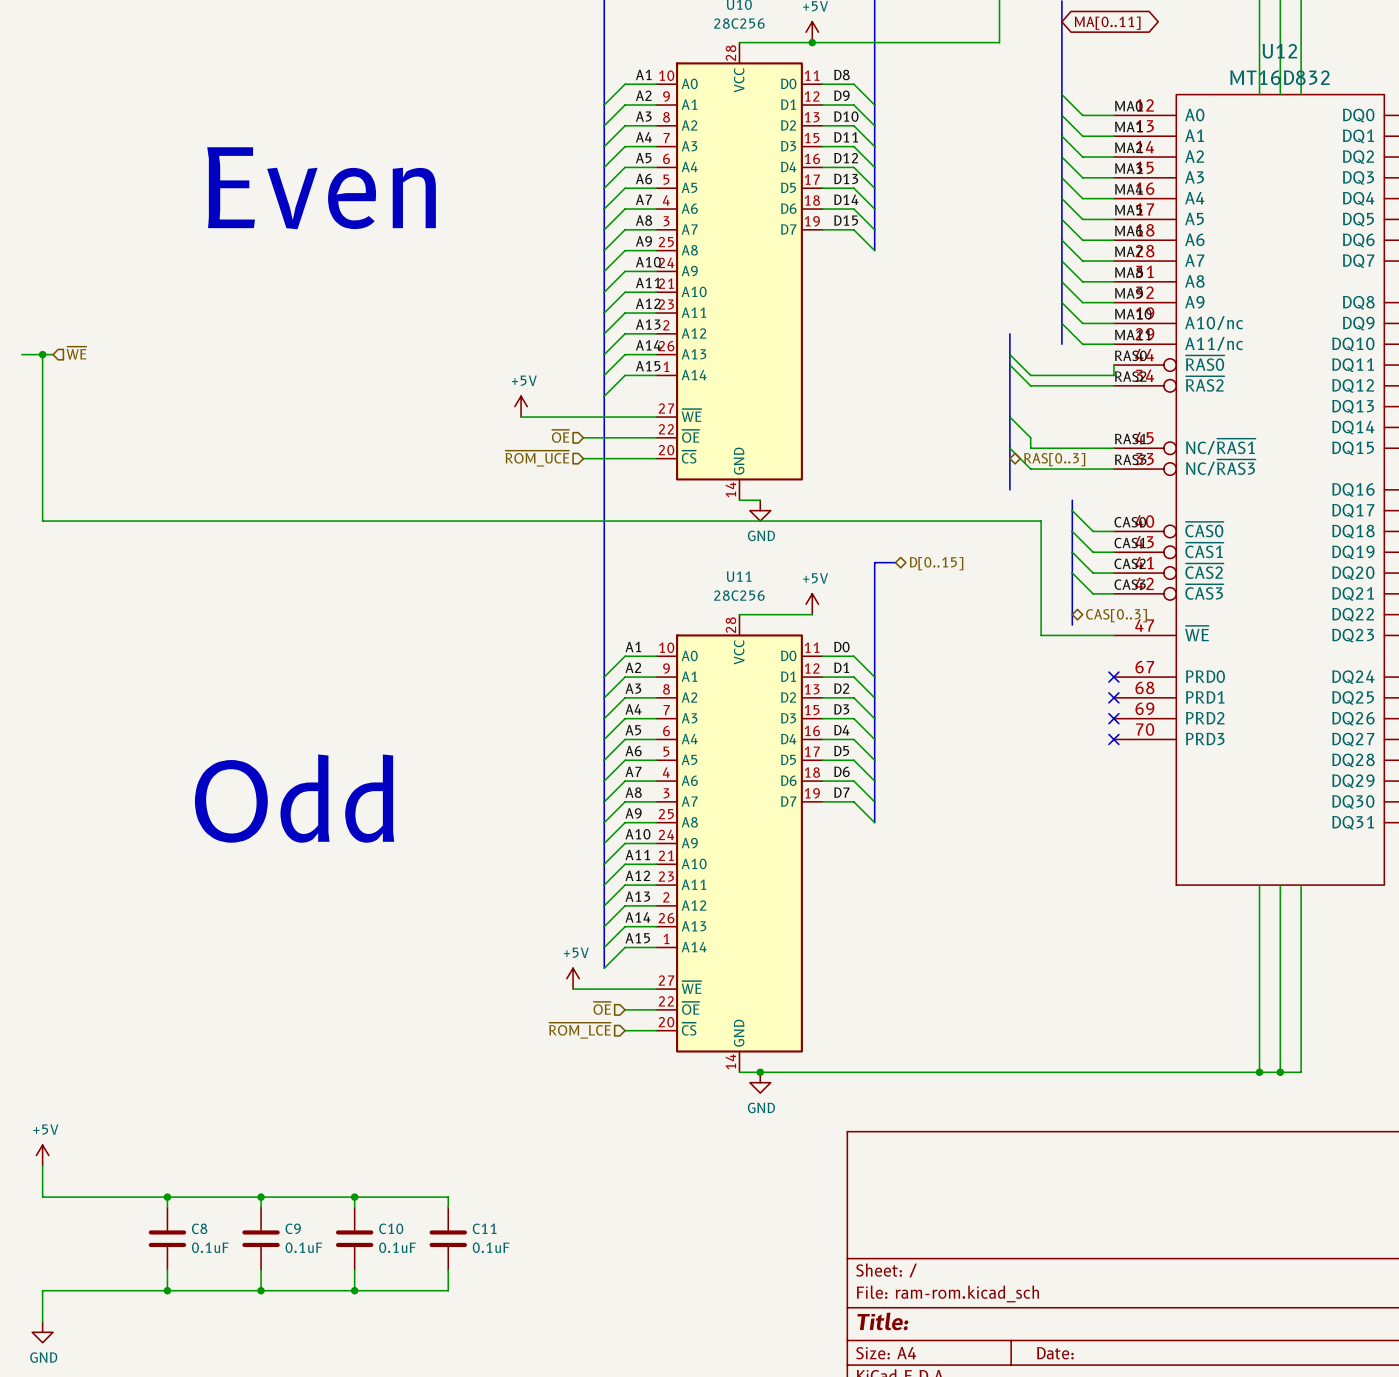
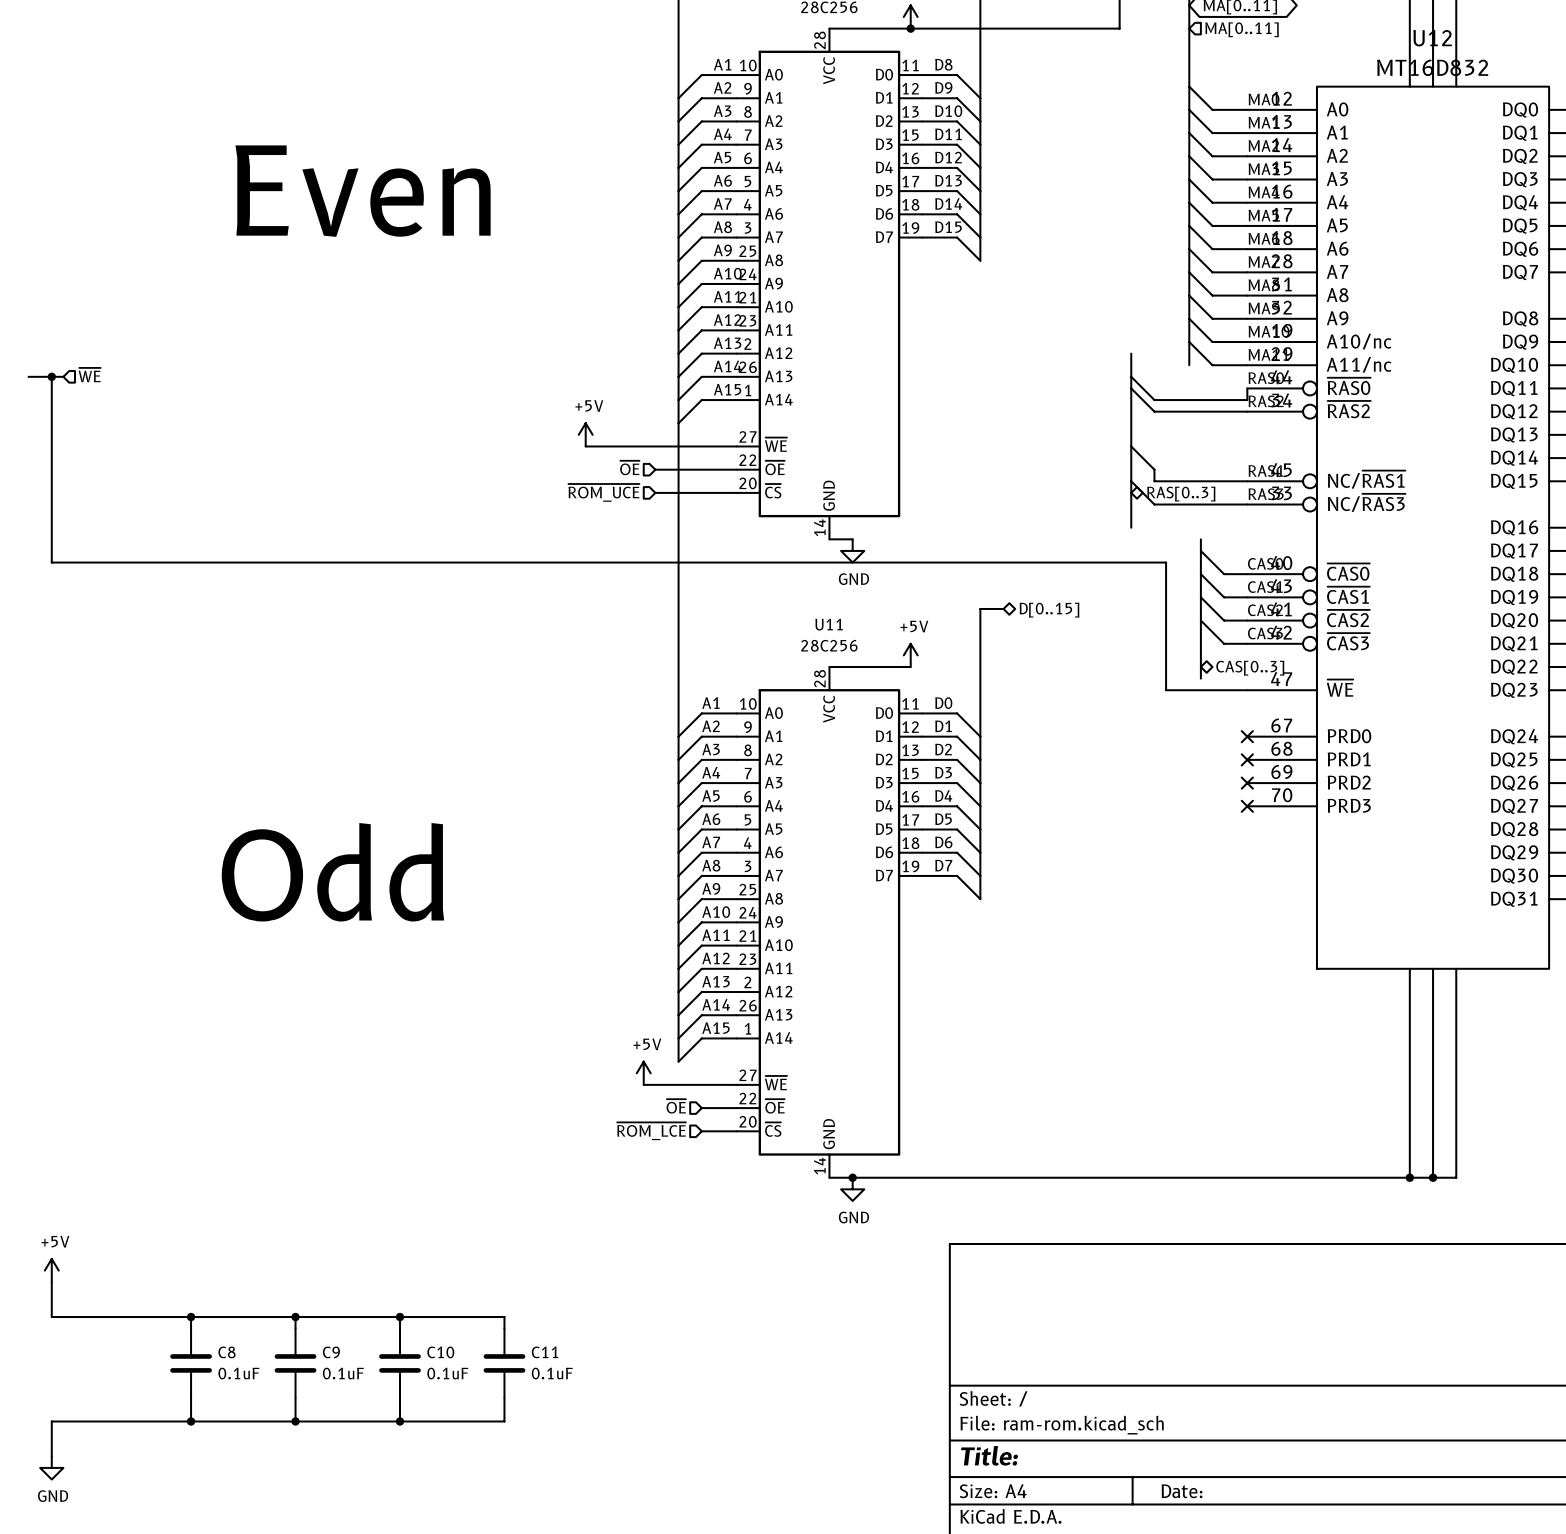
hierarchical label: none -> MA[0..11] (1242, 29)

